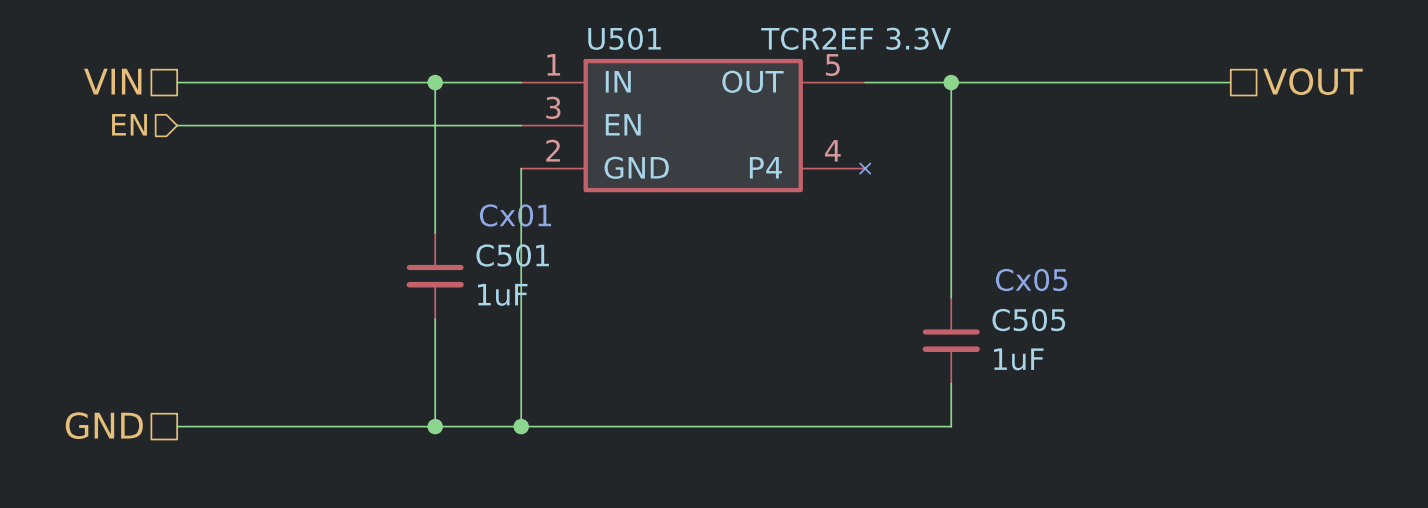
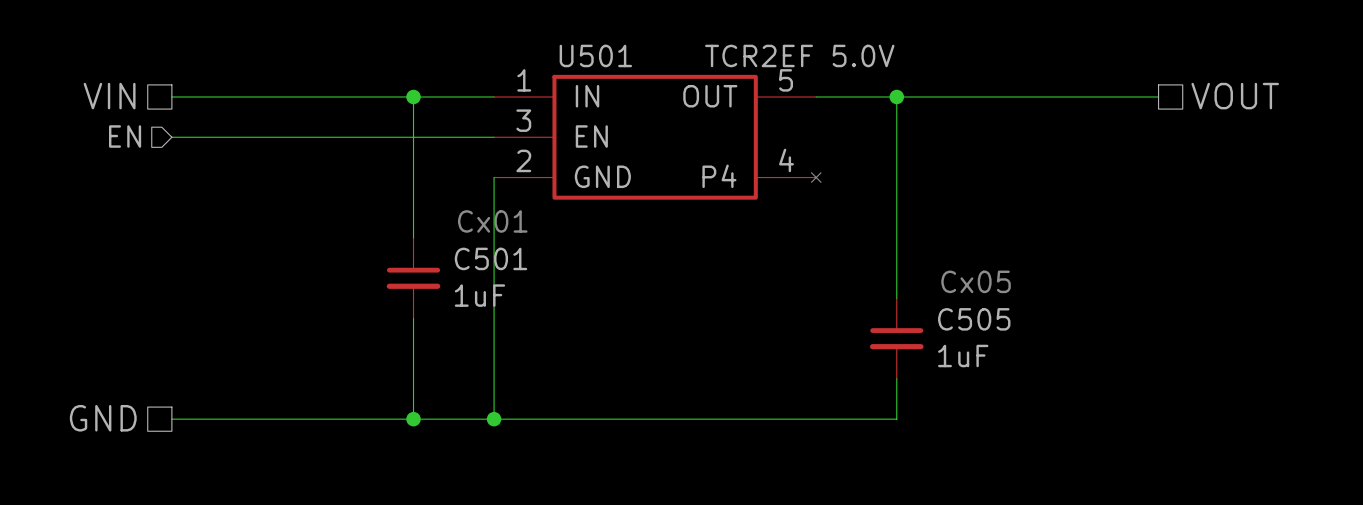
U501 value: TCR2EF 3.3V (856, 38) -> TCR2EF 5.0V (799, 55)

